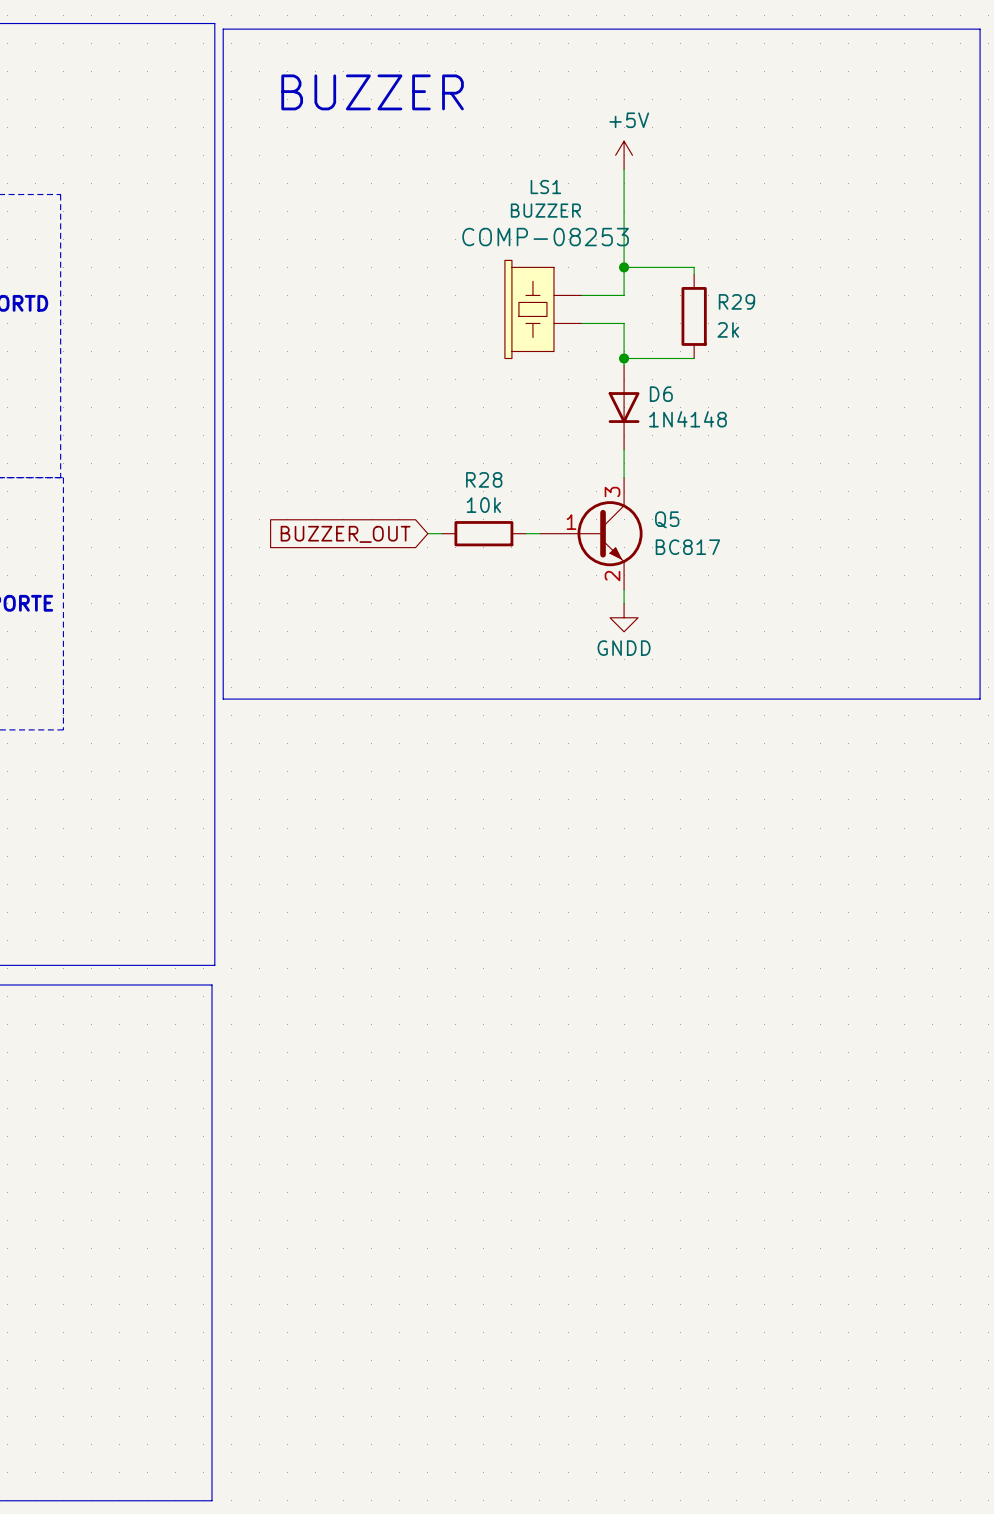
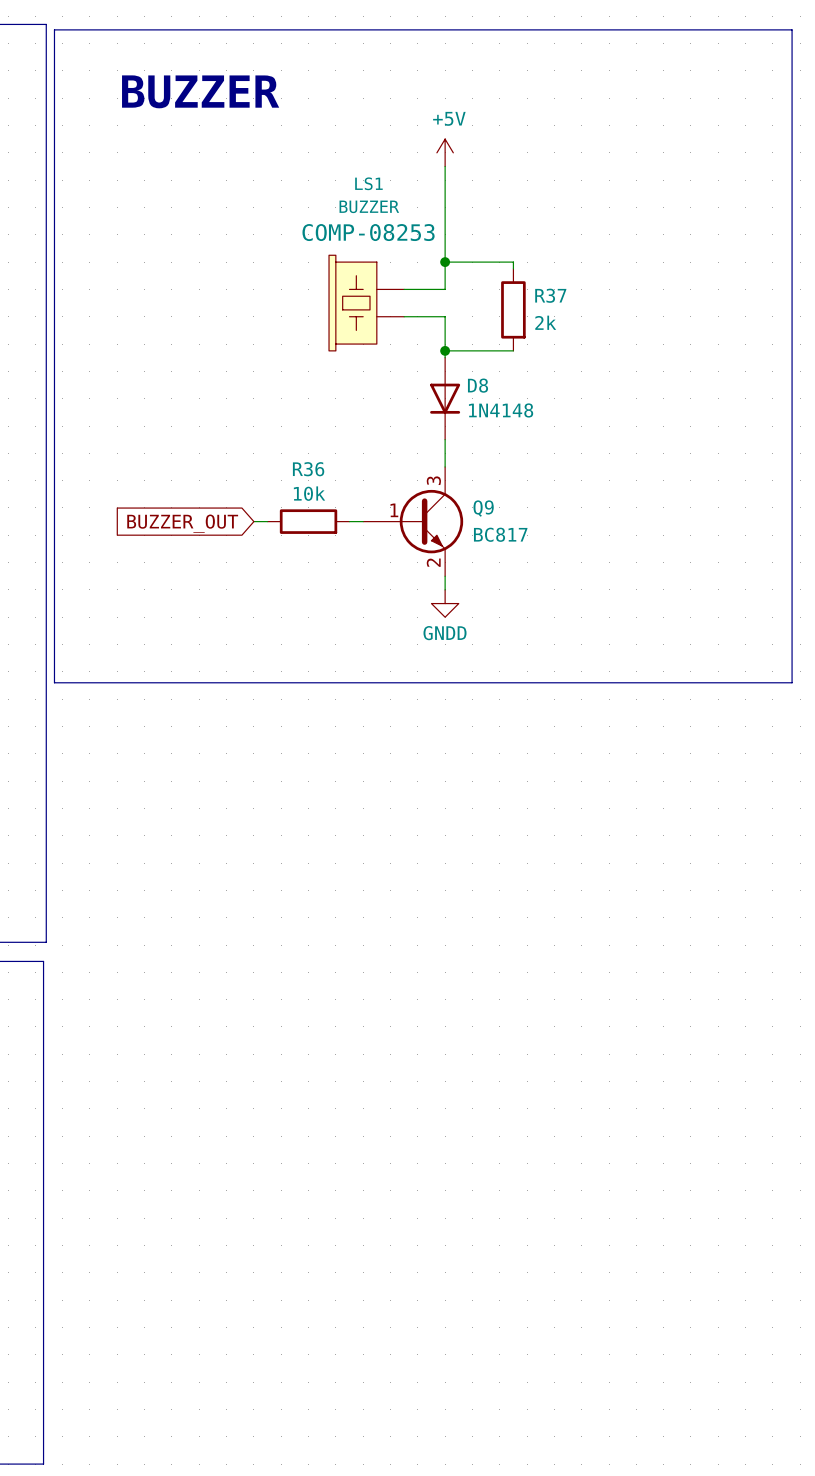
R29 name: R29 (736, 301) -> R37 (550, 295)
D6 name: D6 (661, 394) -> D8 (478, 385)
R28 name: R28 (484, 479) -> R36 (308, 469)
Q5 name: Q5 (667, 519) -> Q9 (483, 508)

